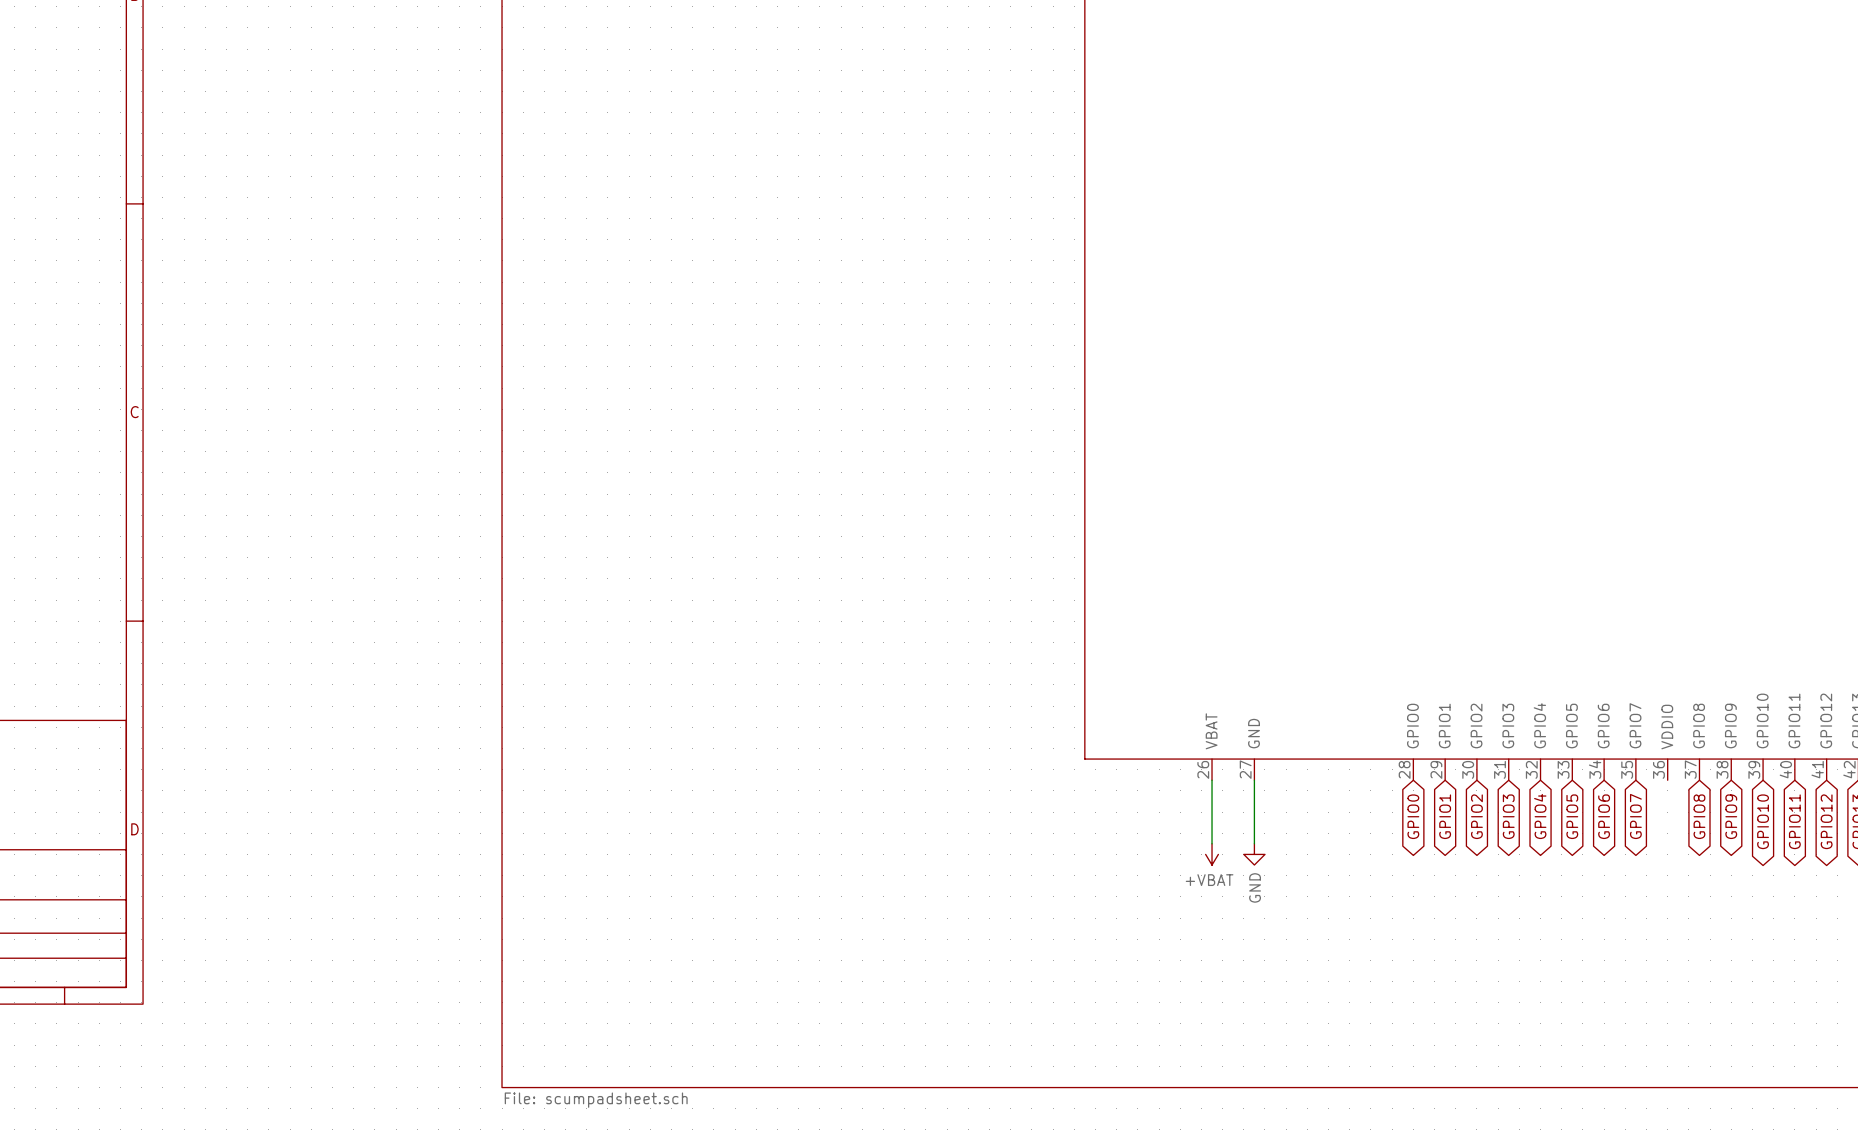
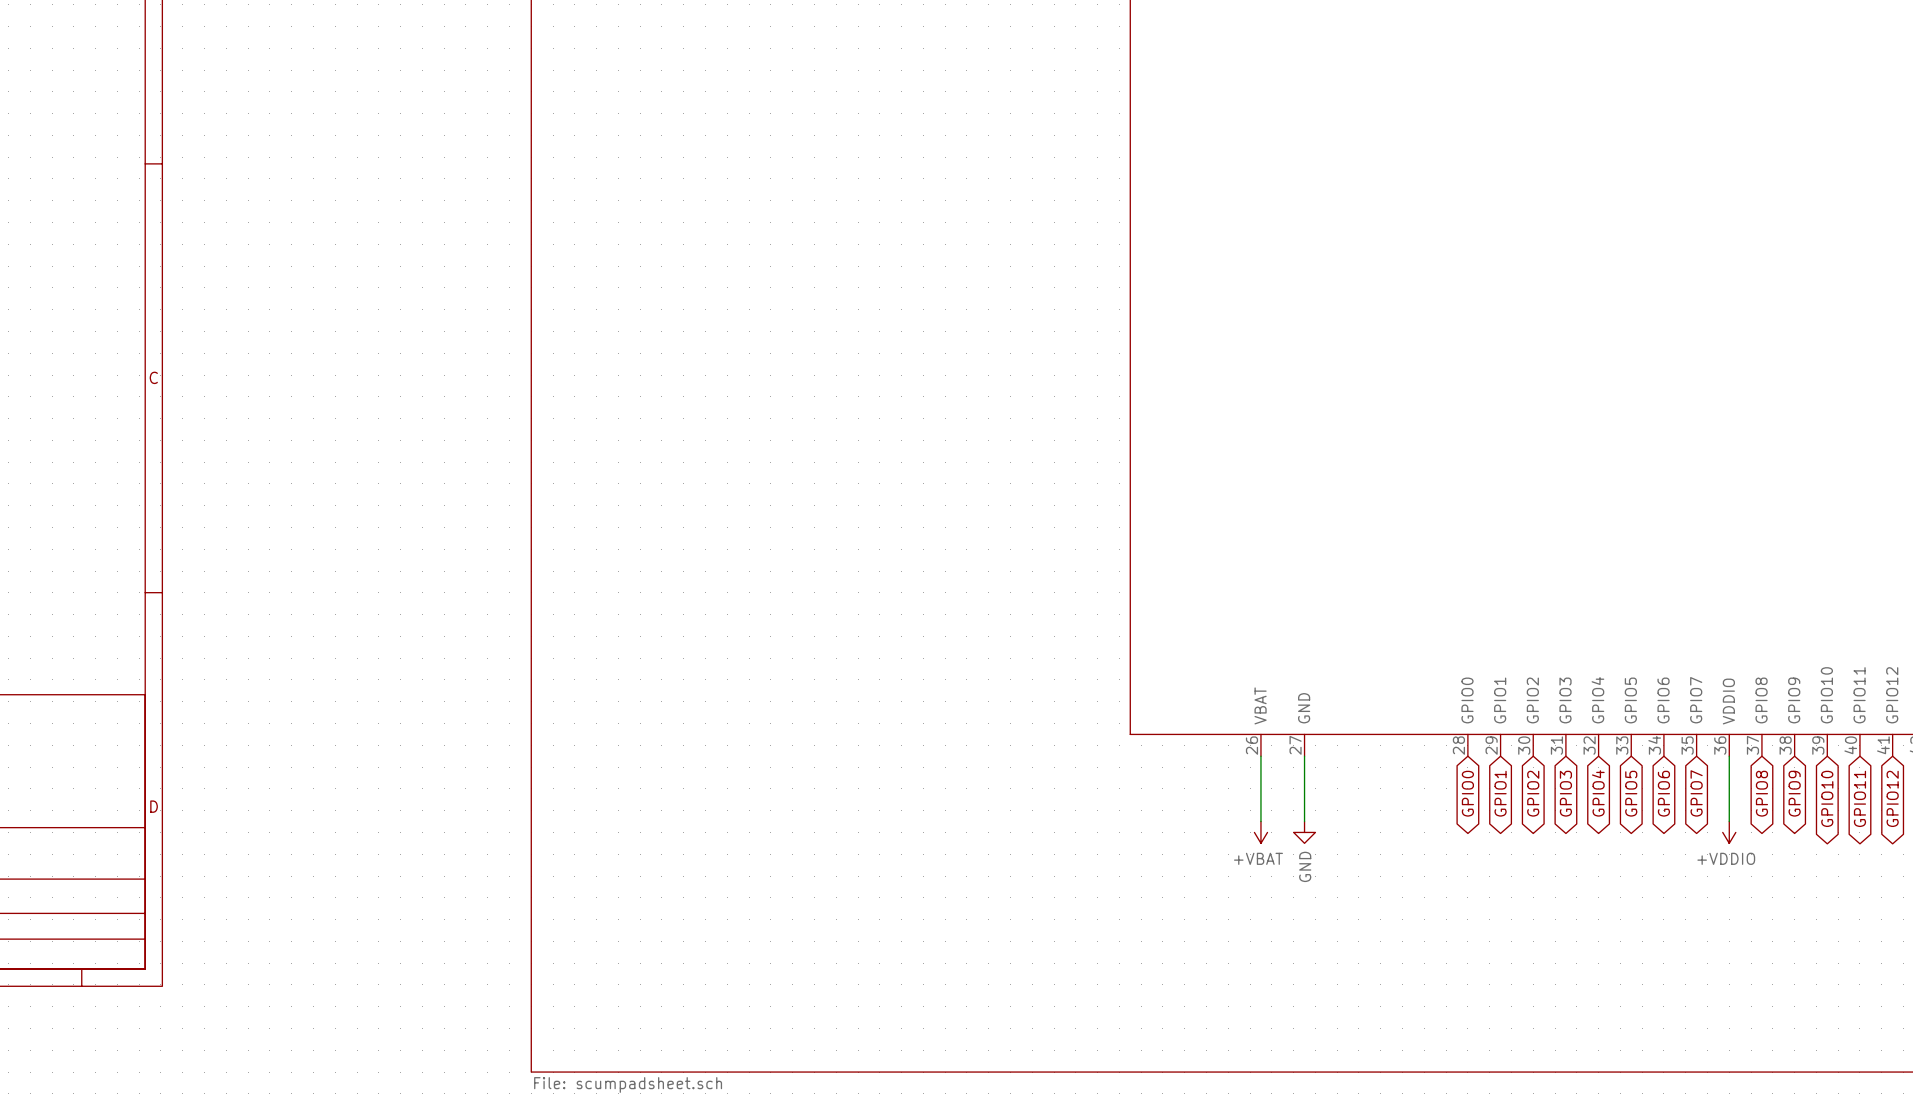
wire: none -> (1729, 756) (1729, 821)
power symbol: none -> +VDDIO (1729, 832)

